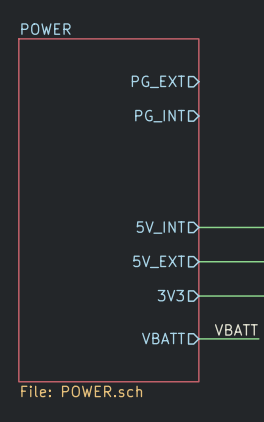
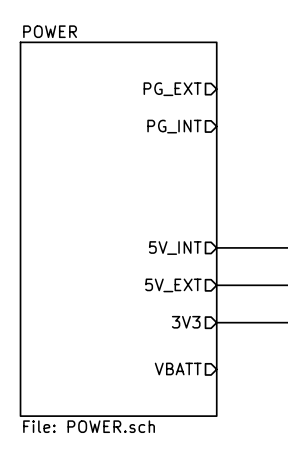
label: VBATT (236, 329) -> none
wire: (198, 338) (258, 338) -> none

